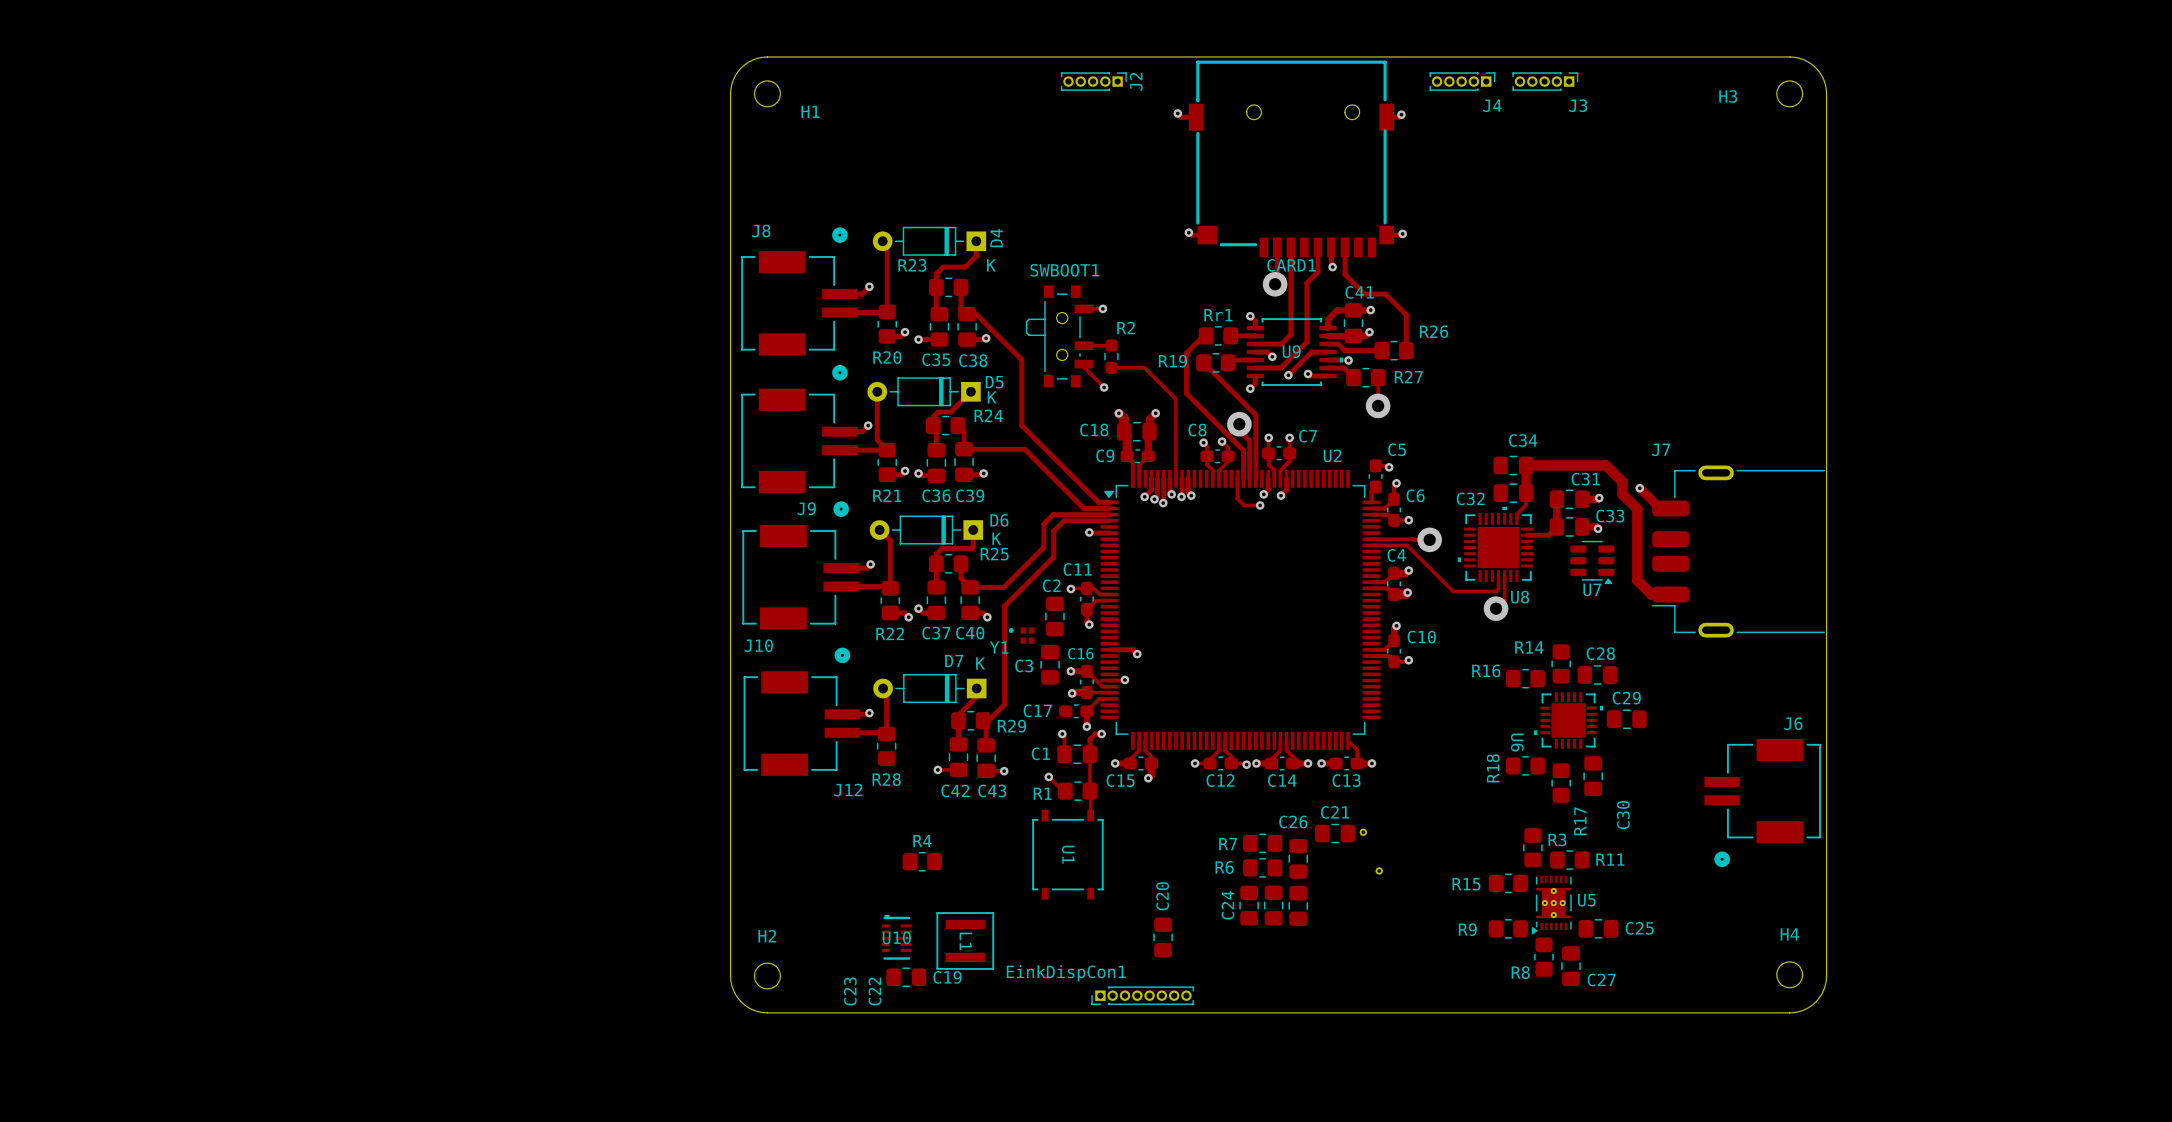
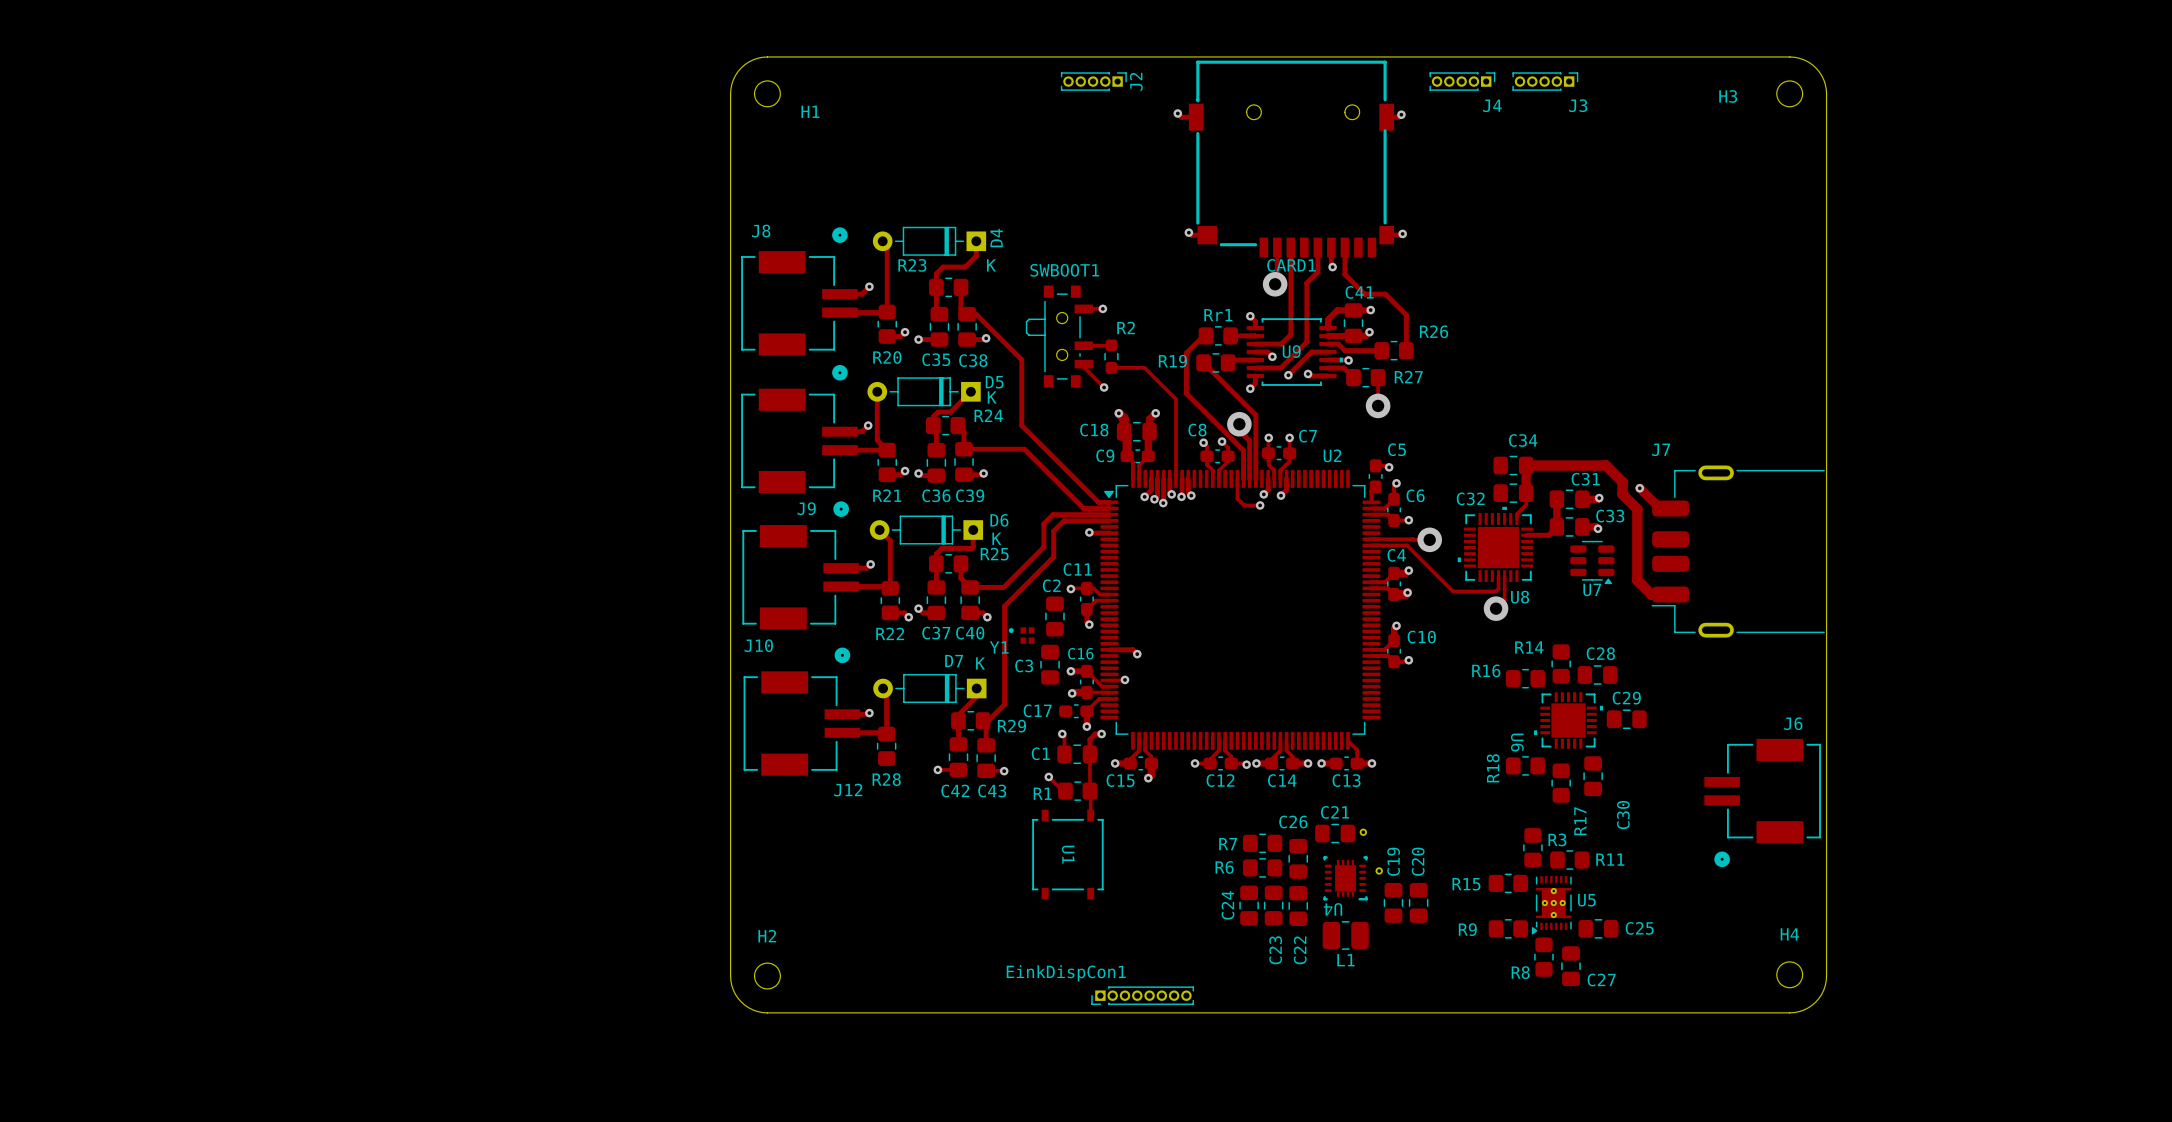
R4: (922, 861) -> none
U4: none -> (1345, 878)
L1 footprint: [936, 912, 995, 970] -> [1322, 921, 1369, 950]
U10: (896, 937) -> none
C20 position: (1163, 937) -> (1418, 902)
L1 name position: L1 (965, 941) -> L1 (1346, 960)
C19 rotation: 0° (906, 977) -> 90° clockwise (1393, 902)
C19 position: (906, 977) -> (1393, 902)
C19 name position: C19 (947, 977) -> C19 (1393, 861)
C23 name position: C23 (850, 991) -> C23 (1275, 950)
C22 name position: C22 (874, 991) -> C22 (1300, 950)

